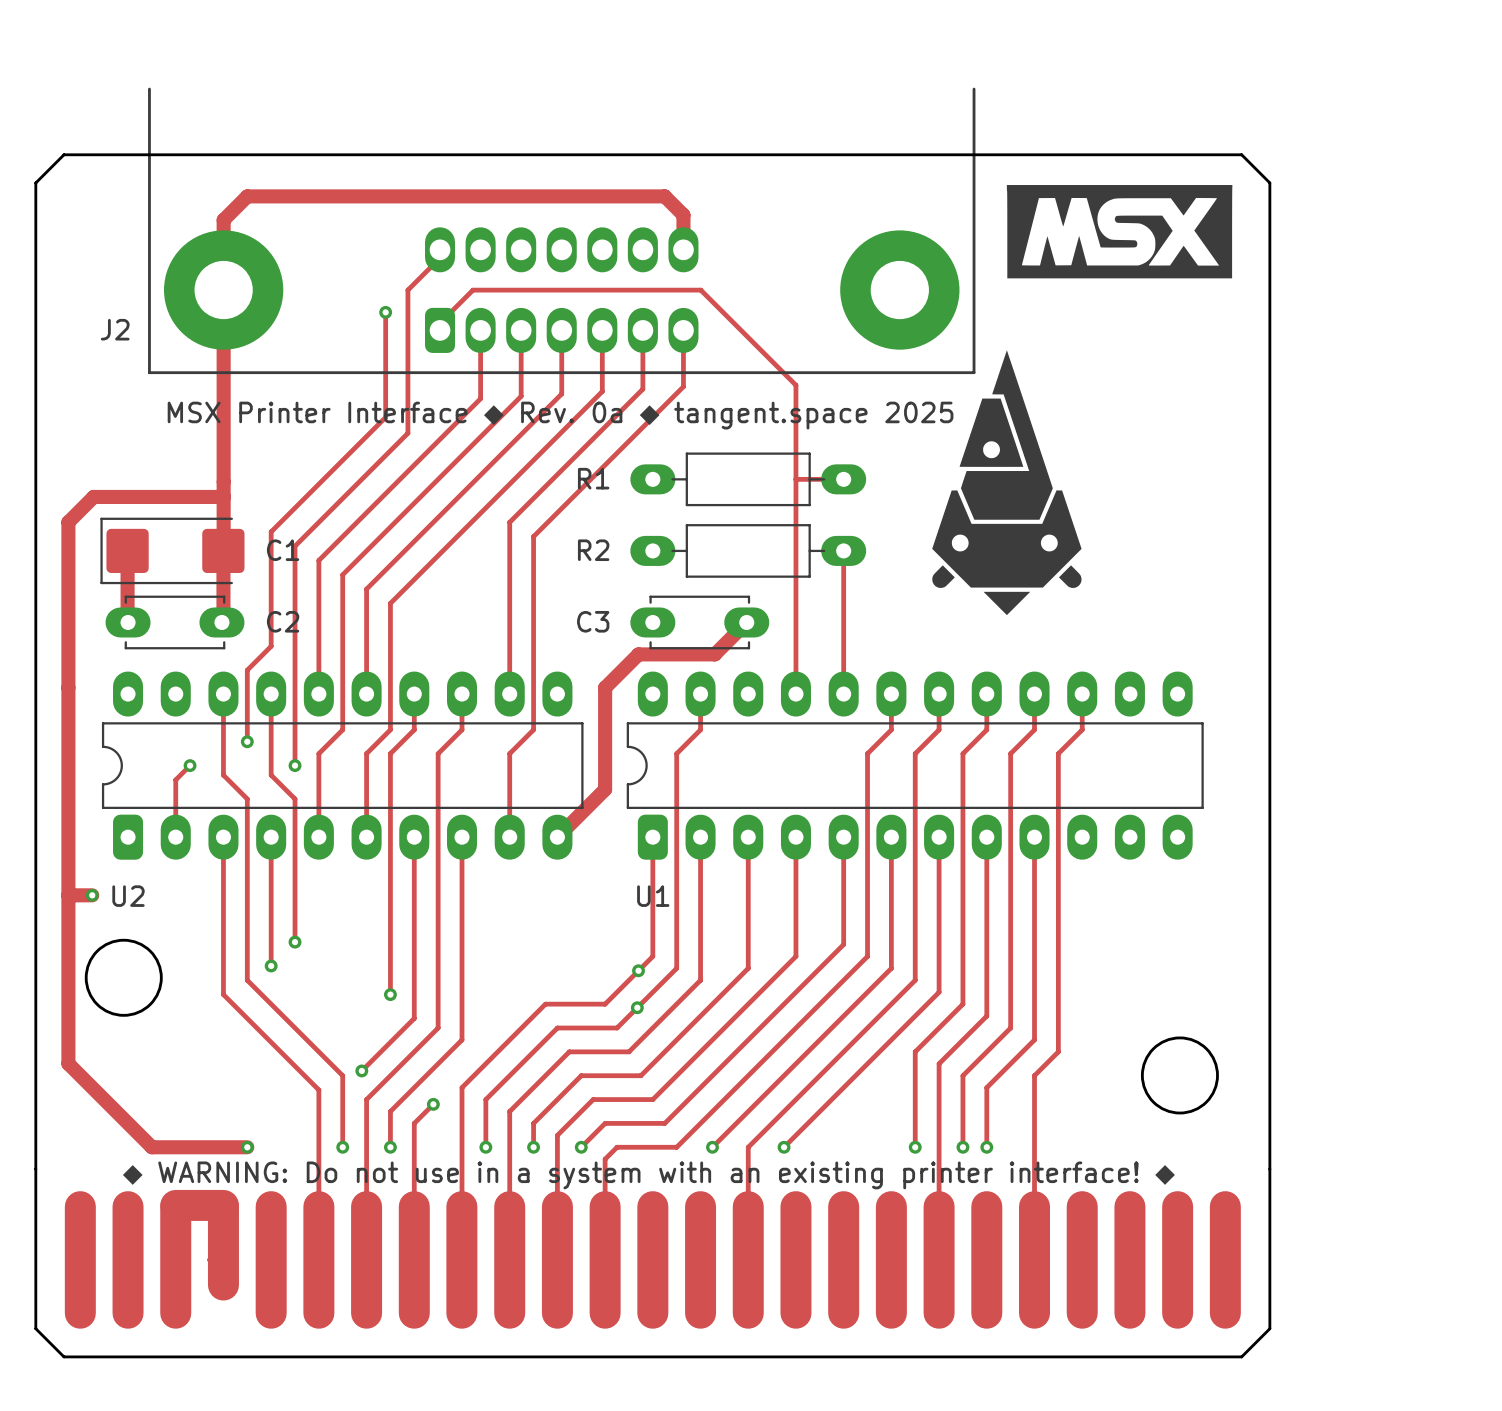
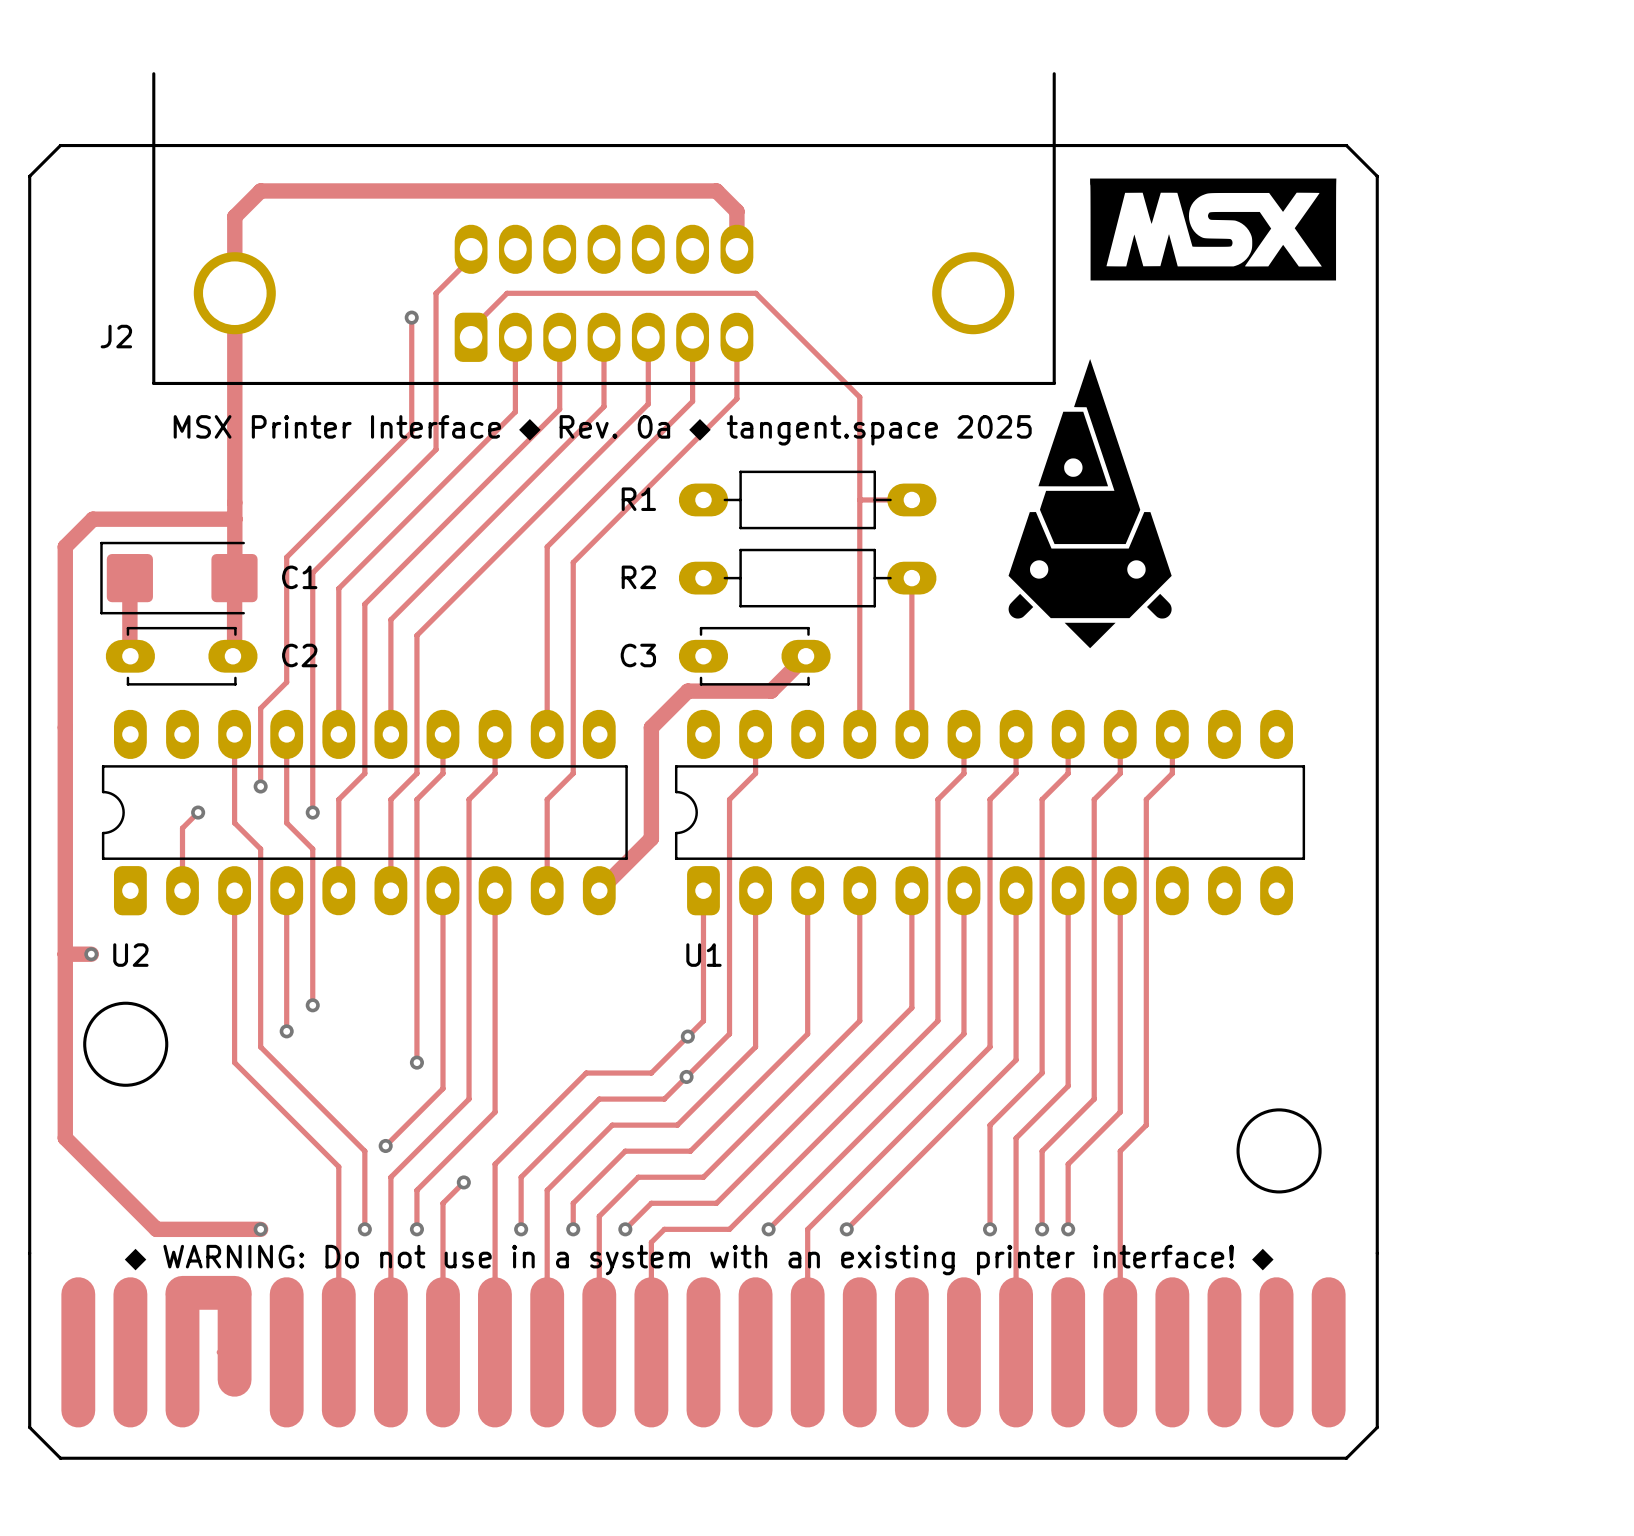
J2 footprint: [148, 87, 976, 375] -> [152, 72, 1056, 386]

